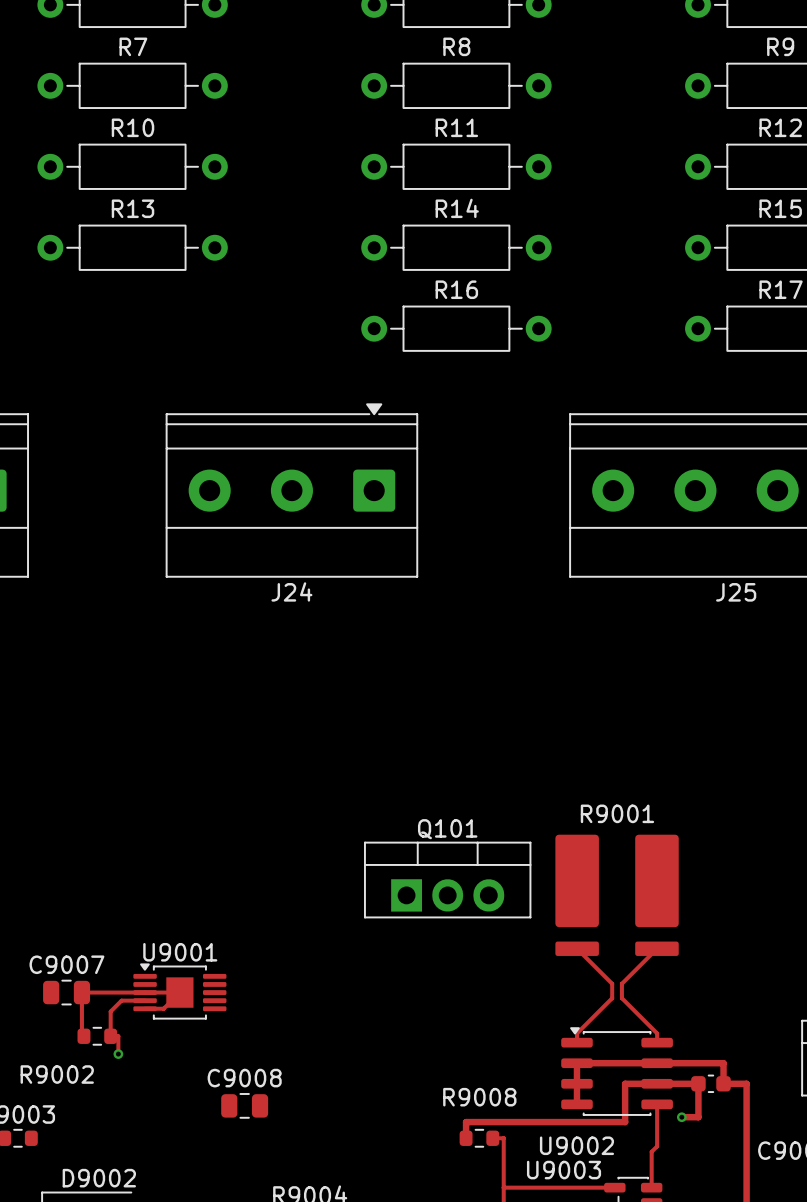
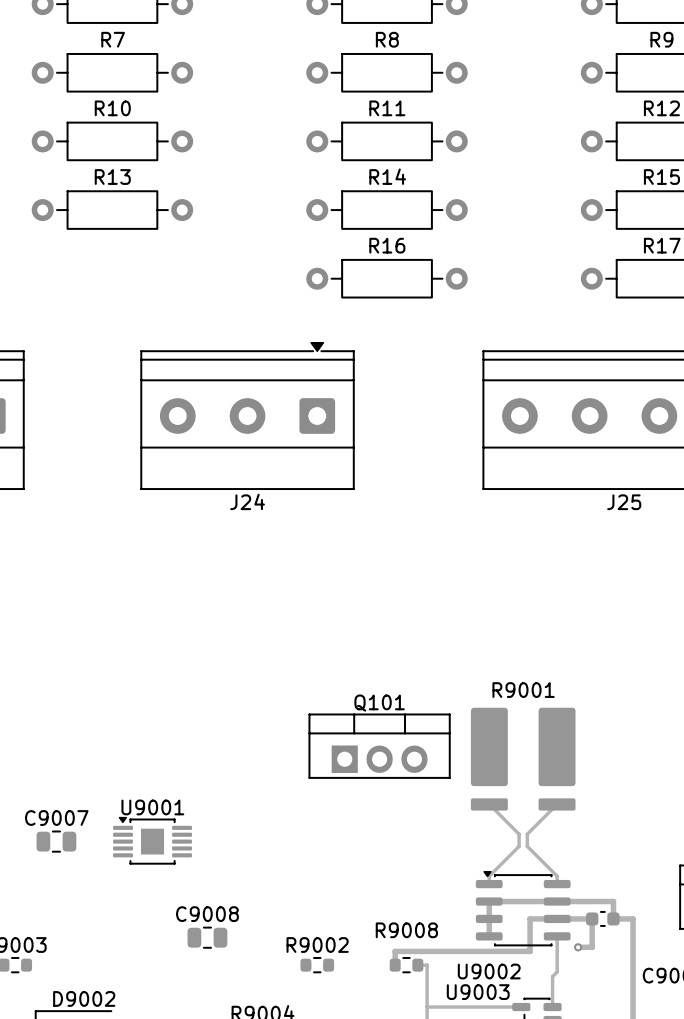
track: (145, 1000) (121, 1000) (110, 1011) (110, 1036) (118, 1036) (118, 1054) -> none
track: (145, 1008) (163, 1008) (179, 992) (81, 992) (81, 1034) (83, 1036) -> none
R9002 position: (97, 1036) -> (317, 965)
via: (118, 1054) -> none
R9002 name position: R9002 (57, 1074) -> R9002 (317, 945)

